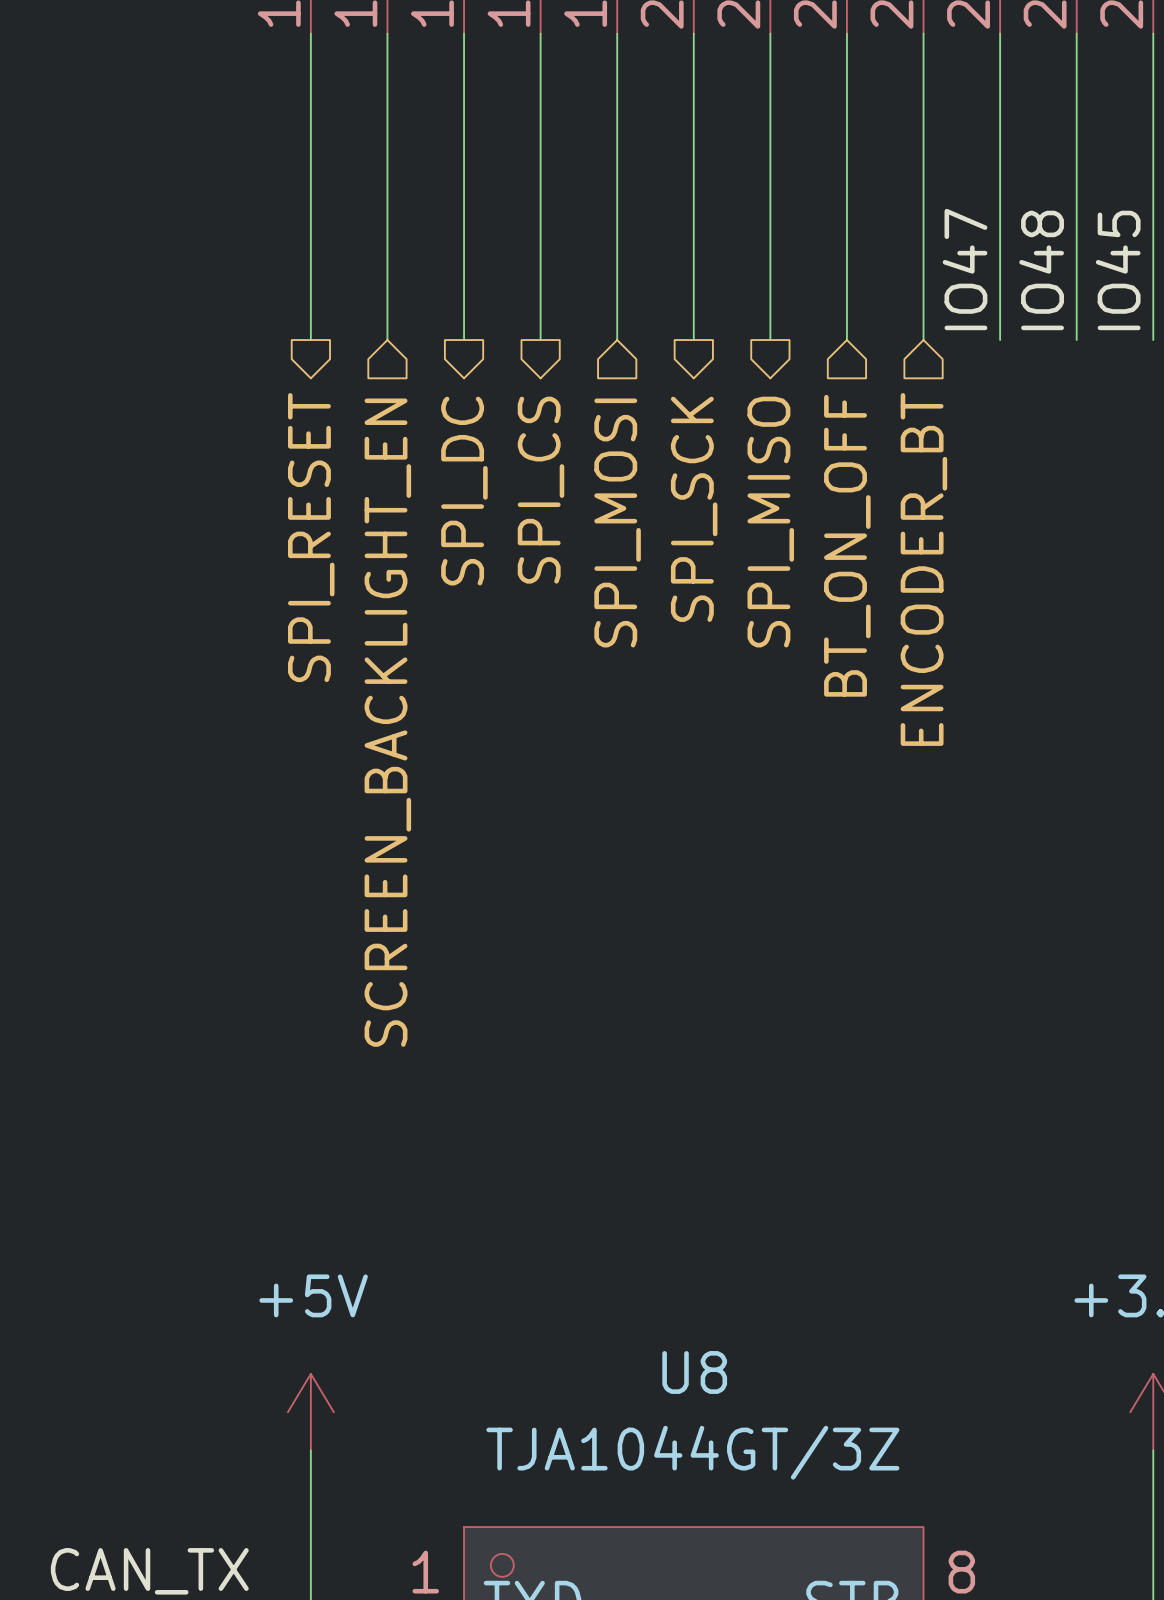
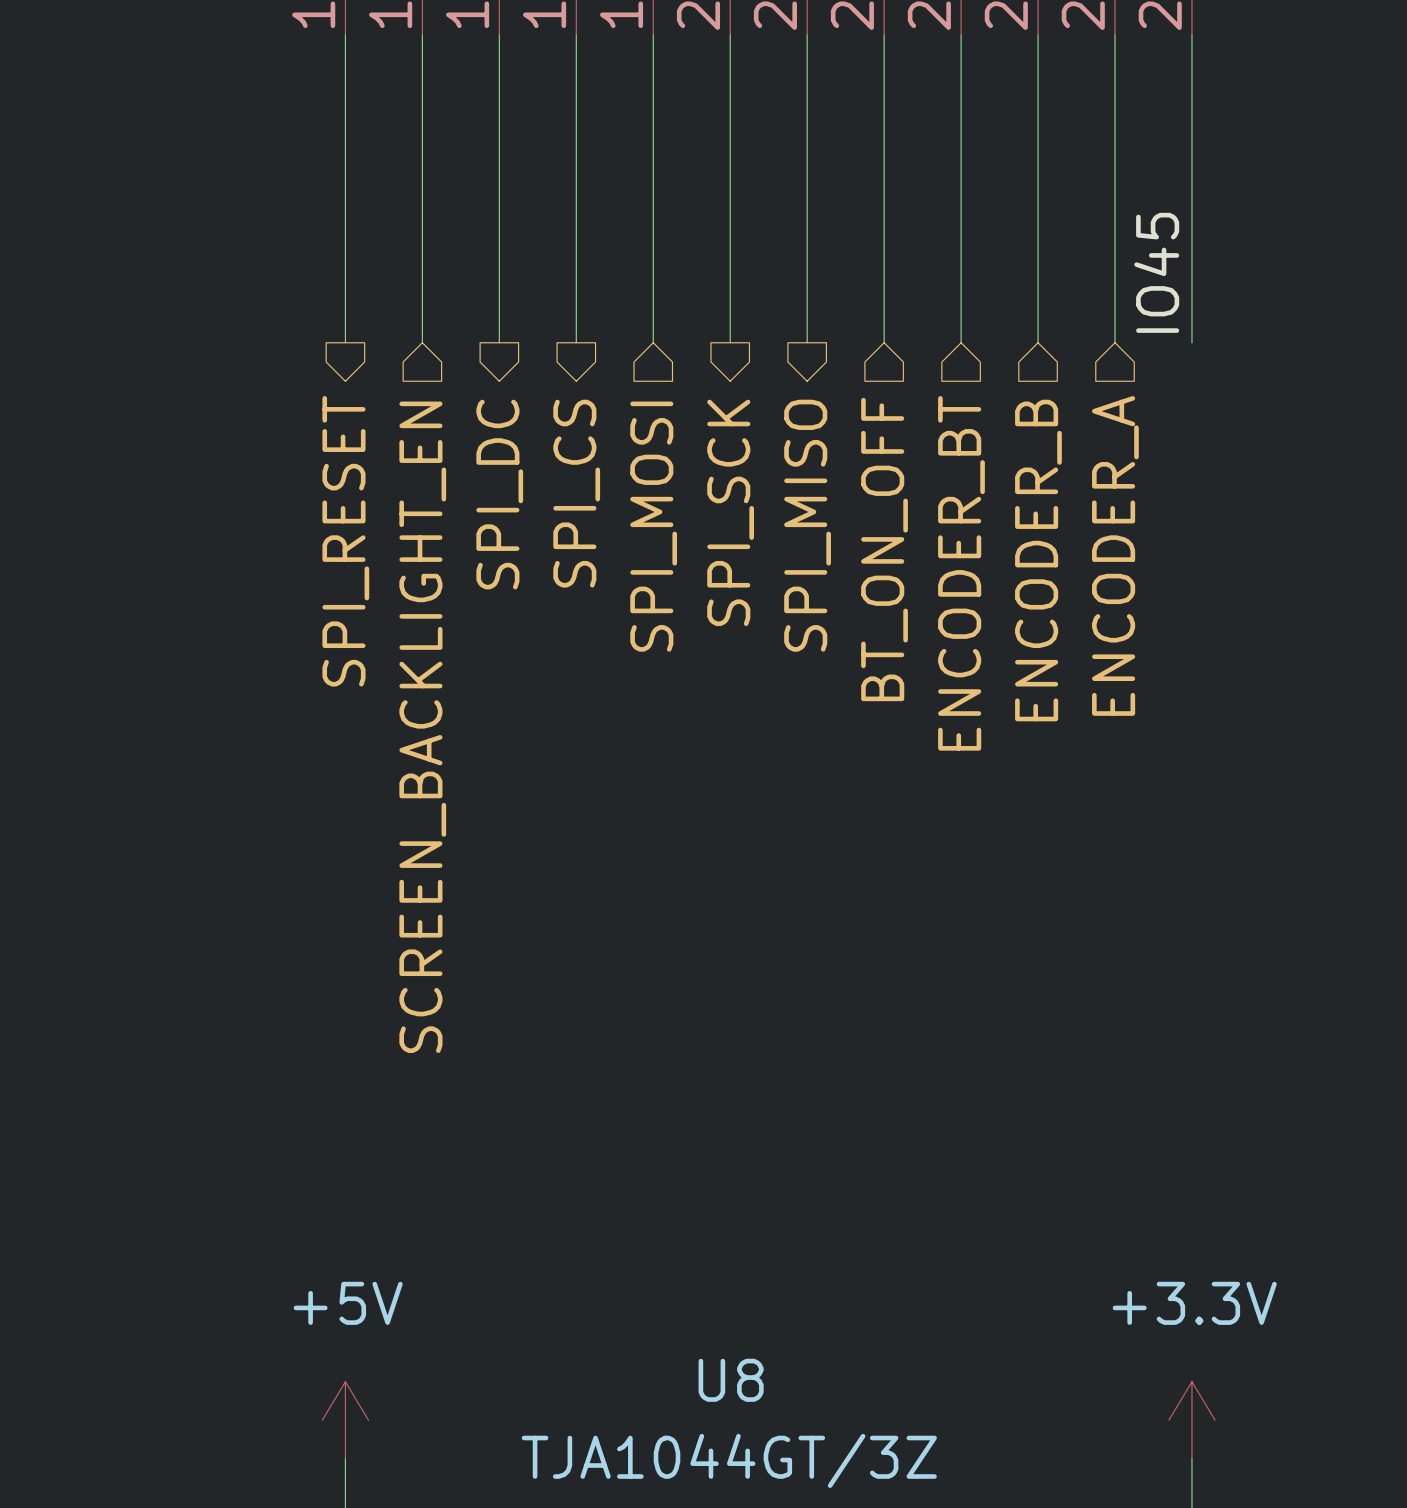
label: IO47 (965, 269) -> none
label: IO48 (1041, 270) -> none
hierarchical label: none -> ENCODER_A (1115, 555)
hierarchical label: none -> ENCODER_B (1038, 560)

